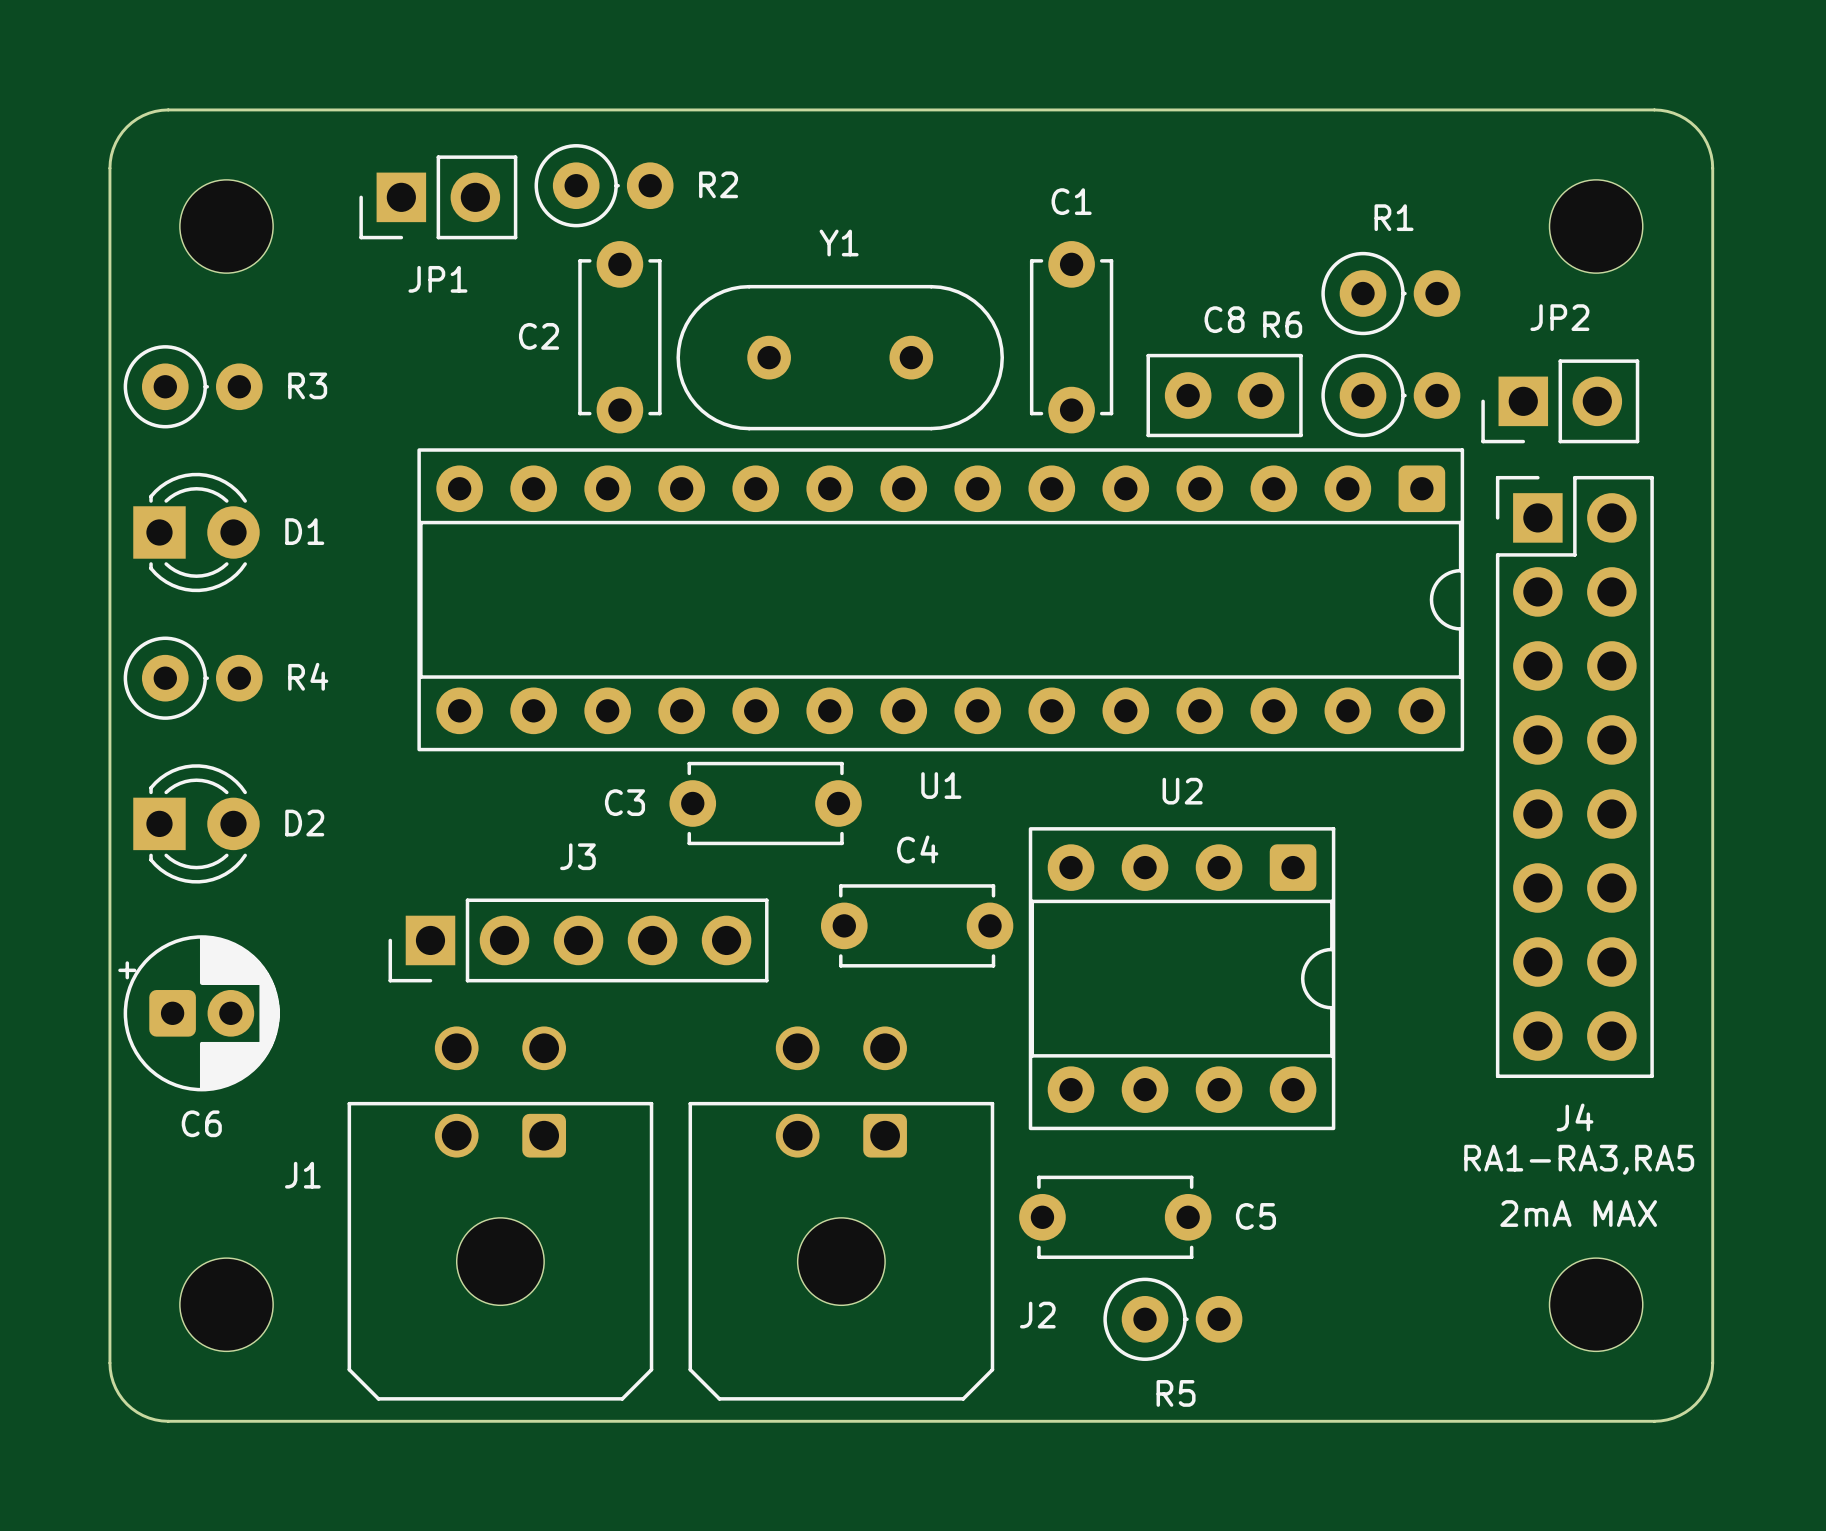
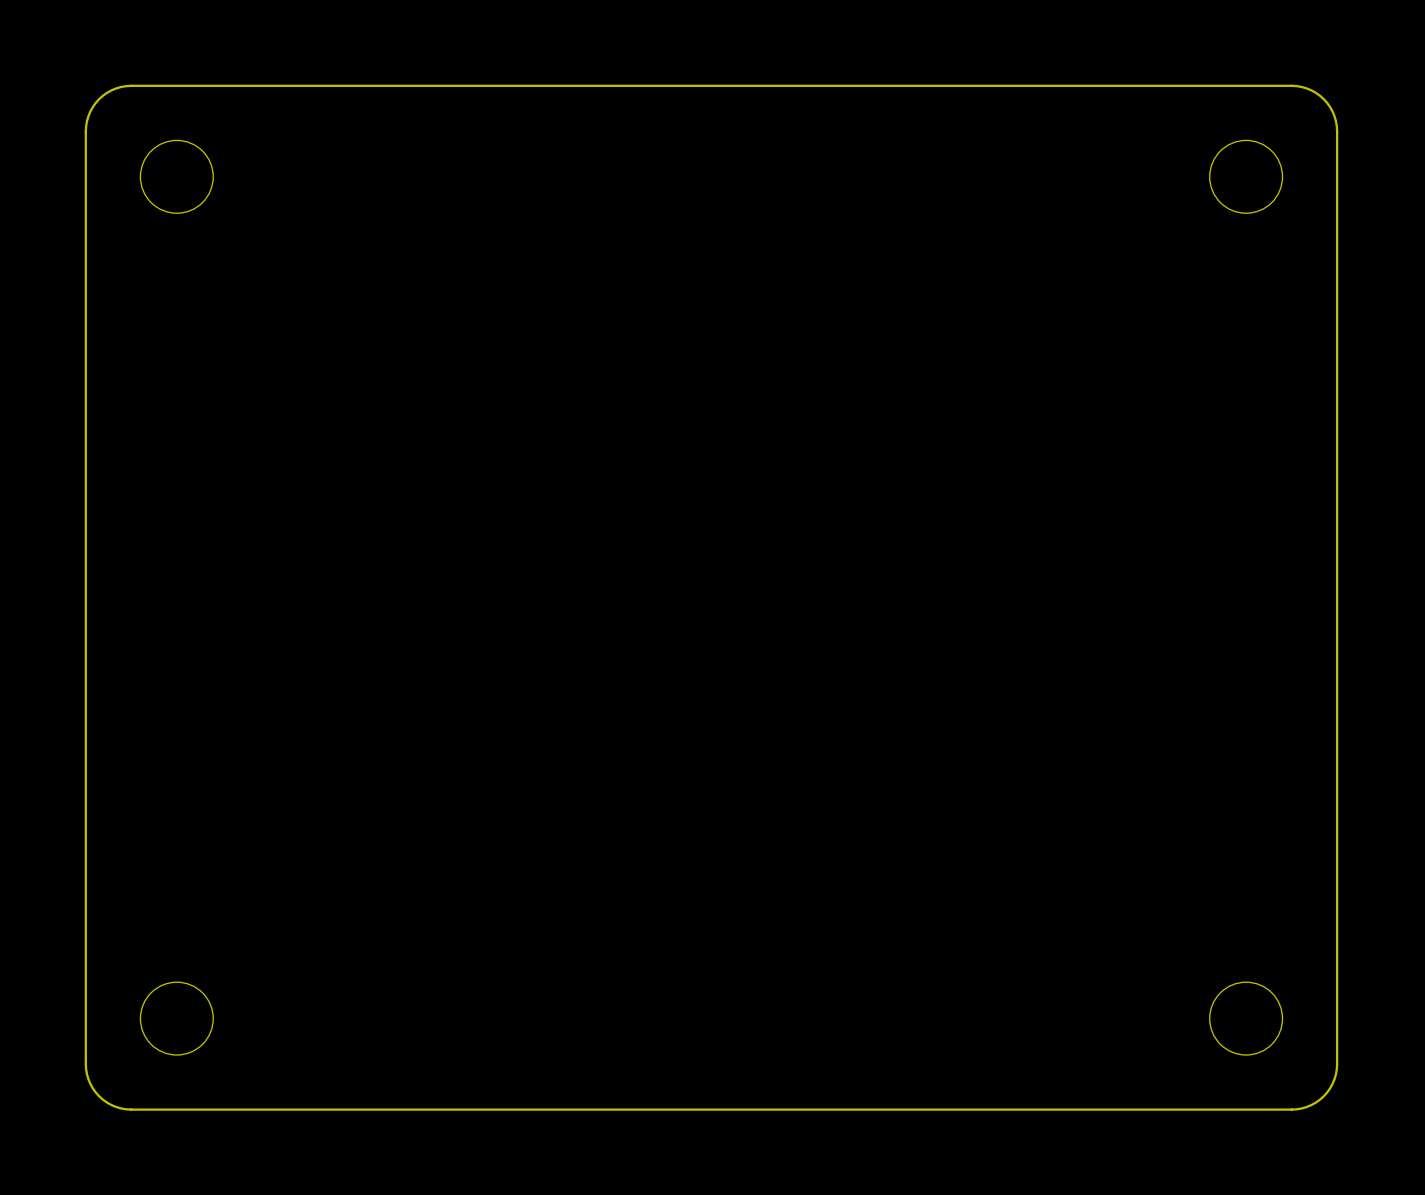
R2: (604, 185) -> none
JP1: (438, 197) -> none
R1: (1390, 293) -> none
C2: (619, 337) -> none
C1: (1071, 337) -> none
Y1: (840, 357) -> none
R3: (193, 386) -> none
C8: (1224, 395) -> none
R6: (1390, 395) -> none
JP2: (1560, 401) -> none
D1: (196, 532) -> none
U1: (940, 599) -> none
R4: (193, 678) -> none
J4: (1574, 776) -> none
C3: (765, 803) -> none
D2: (196, 823) -> none
C4: (917, 925) -> none
J3: (578, 940) -> none
U2: (1182, 978) -> none
C6: (199, 1013) -> none
text: RA1-RA3,RA5 (1579, 1159) -> none
J1: (500, 1213) -> none
J2: (841, 1213) -> none
text: 2mA MAX (1578, 1213) -> none
C5: (1115, 1217) -> none
R5: (1172, 1319) -> none

